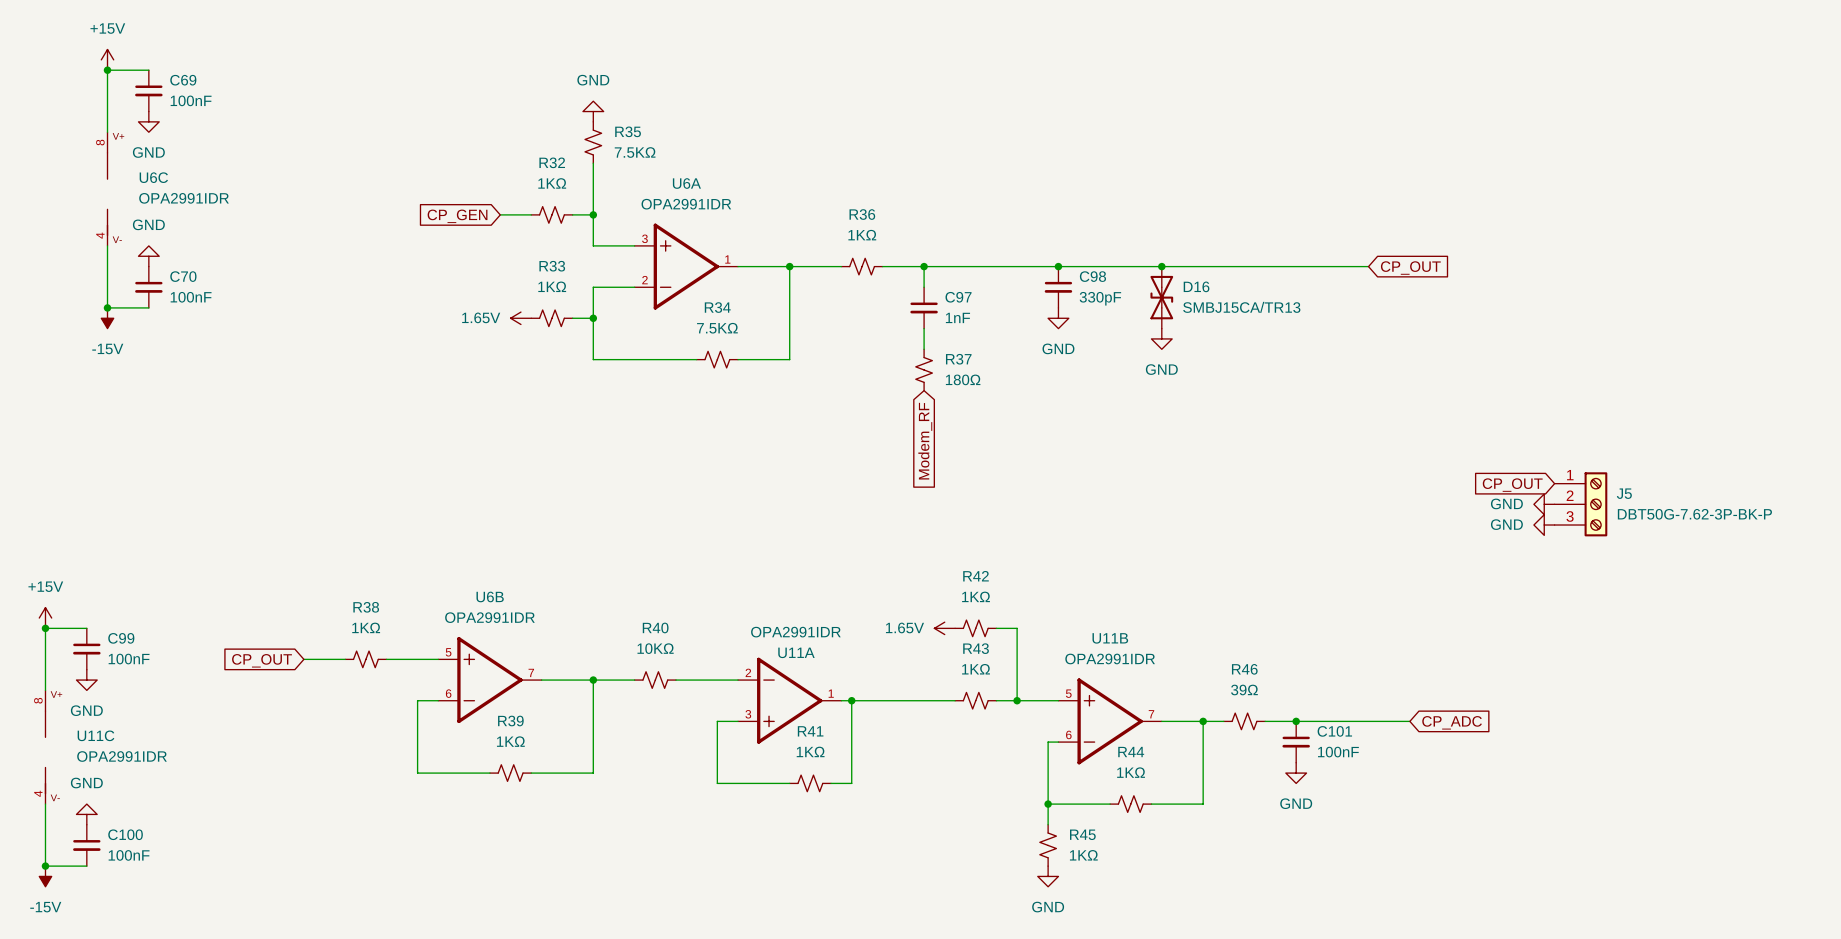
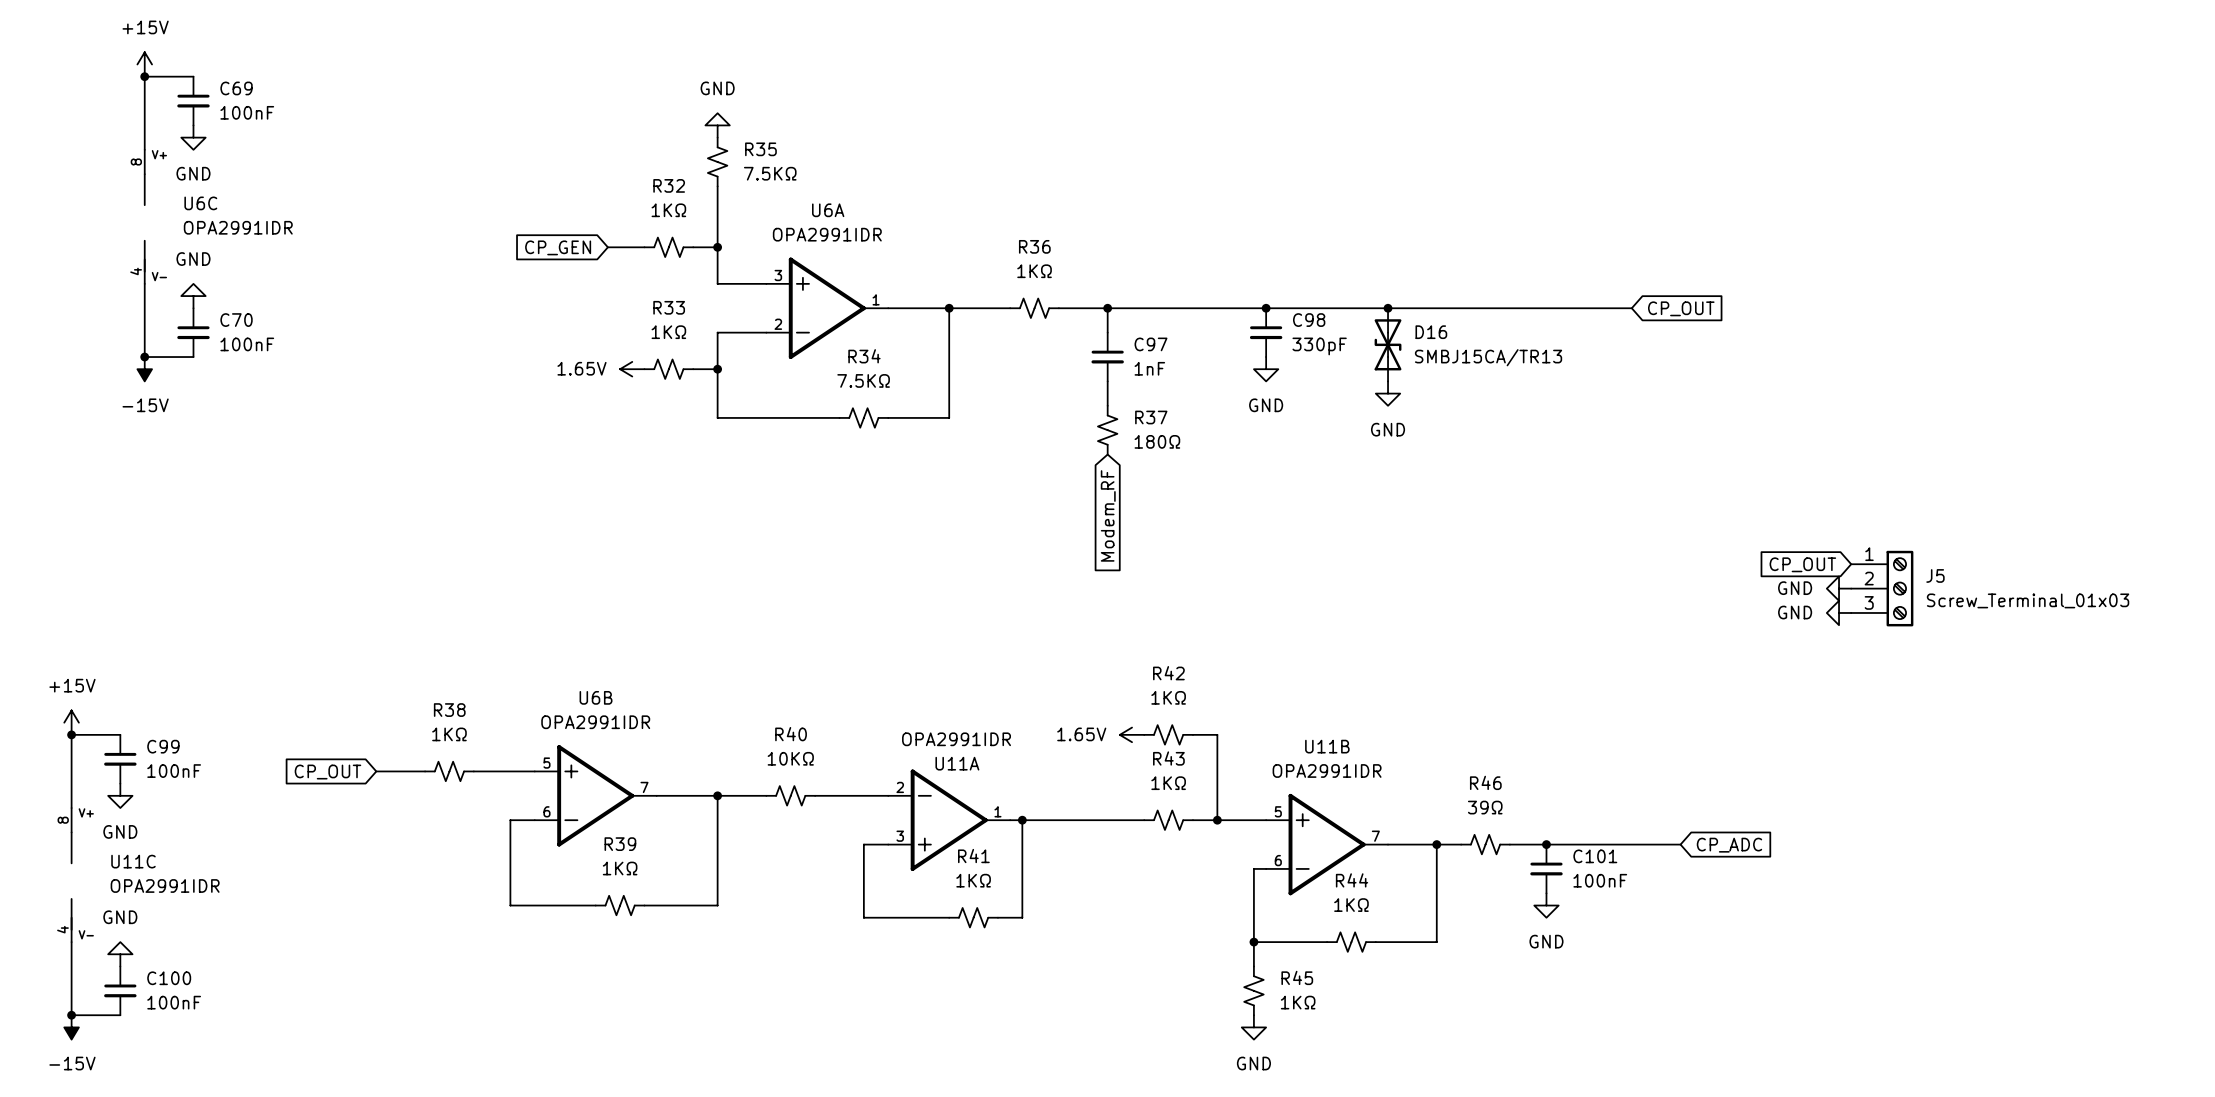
J5 value: DBT50G-7.62-3P-BK-P (1694, 514) -> Screw_Terminal_01x03 (2028, 600)

